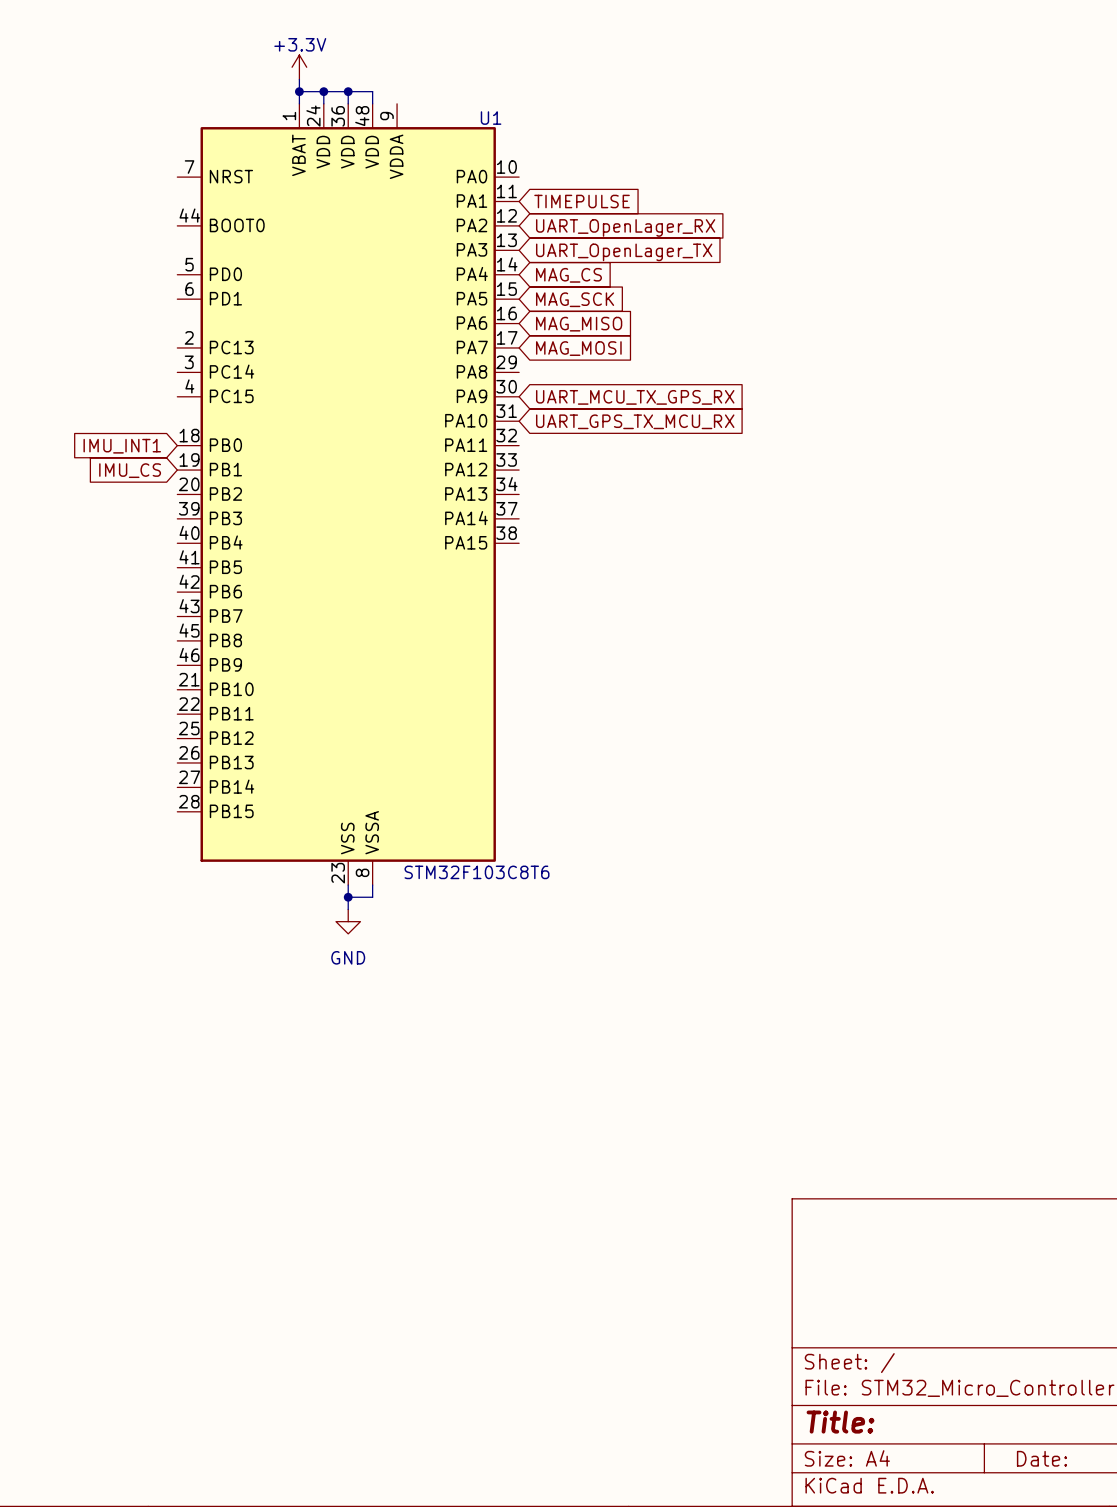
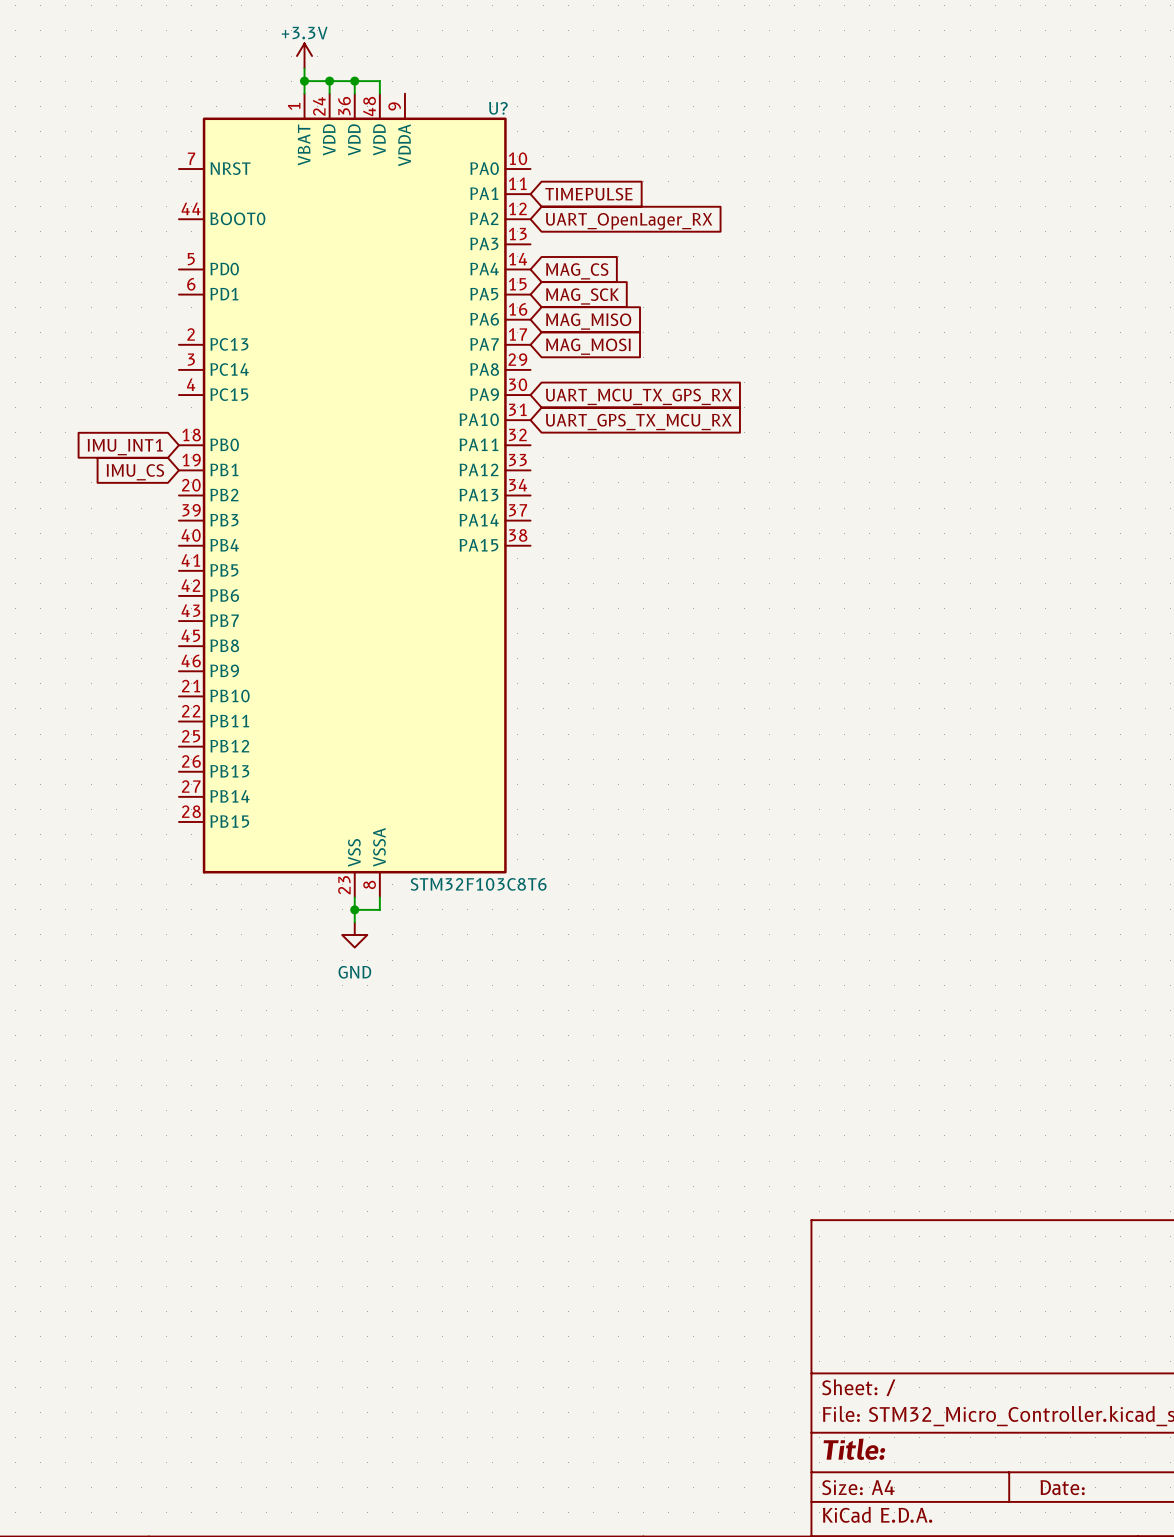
U1 name: U1 (491, 118) -> U? (498, 108)
global label: UART_OpenLager_TX (624, 252) -> none

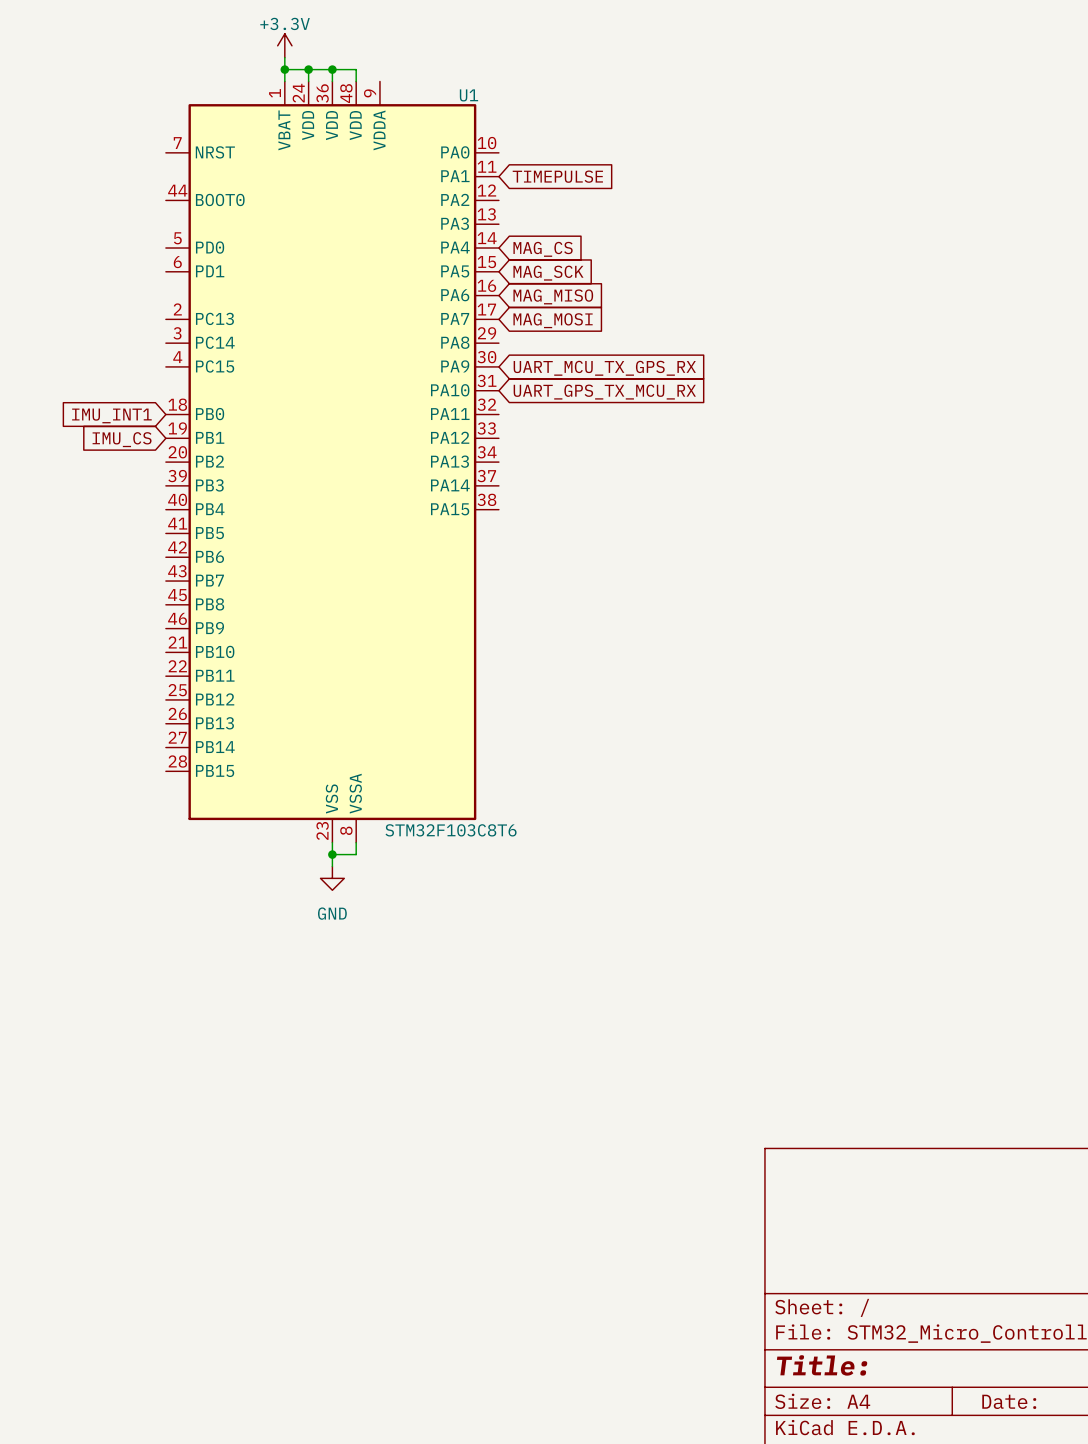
U? name: U? (498, 108) -> U1 (468, 95)
global label: UART_OpenLager_RX (629, 221) -> none

